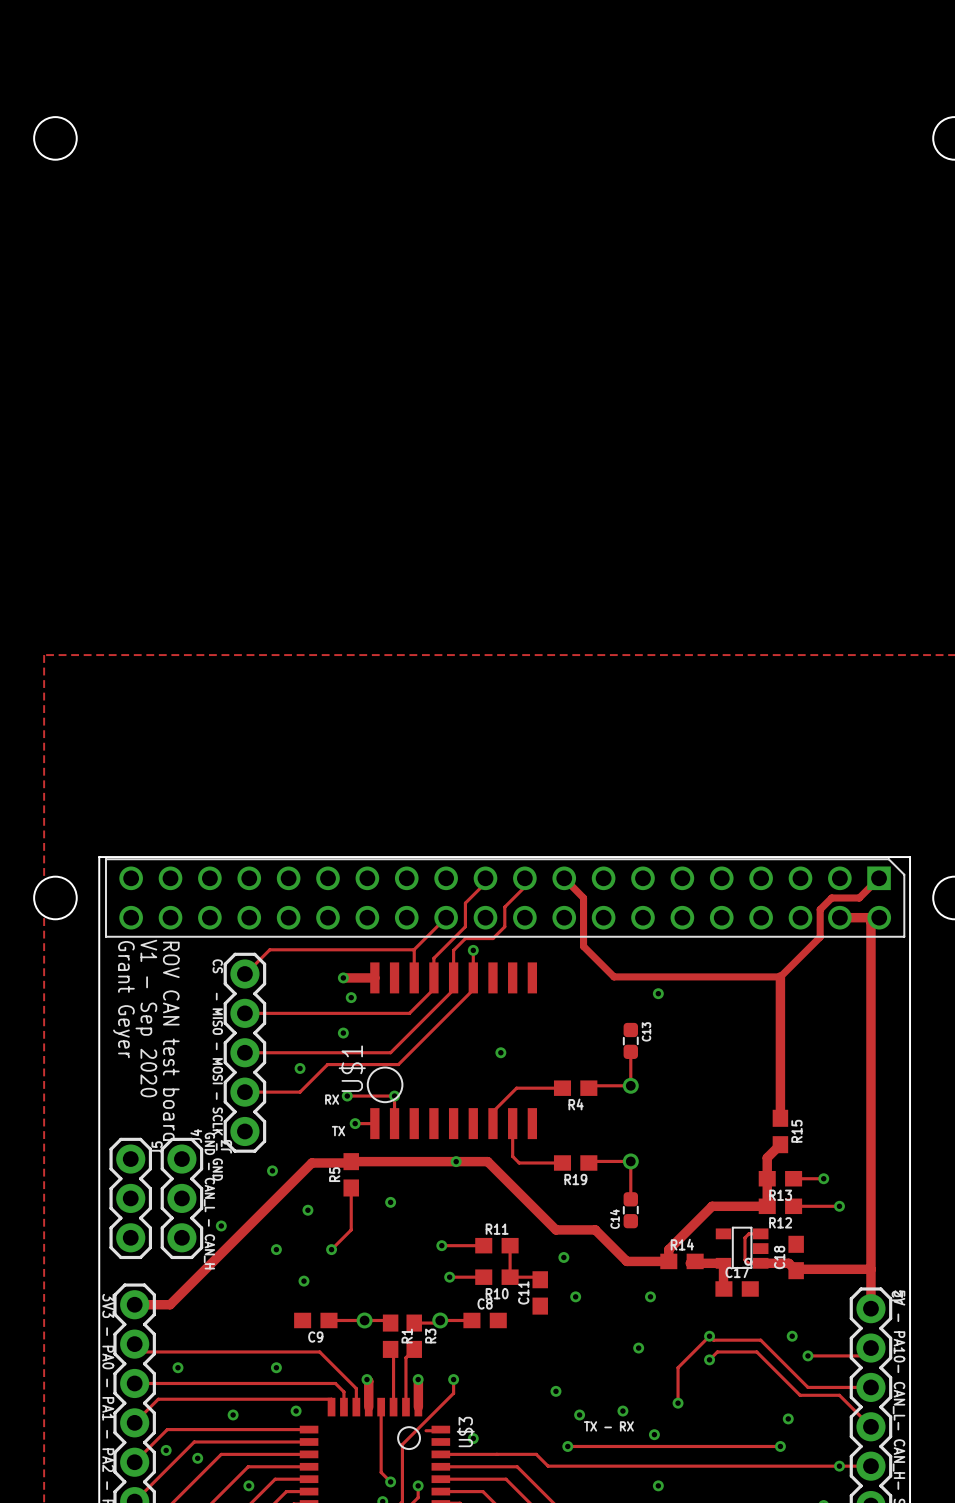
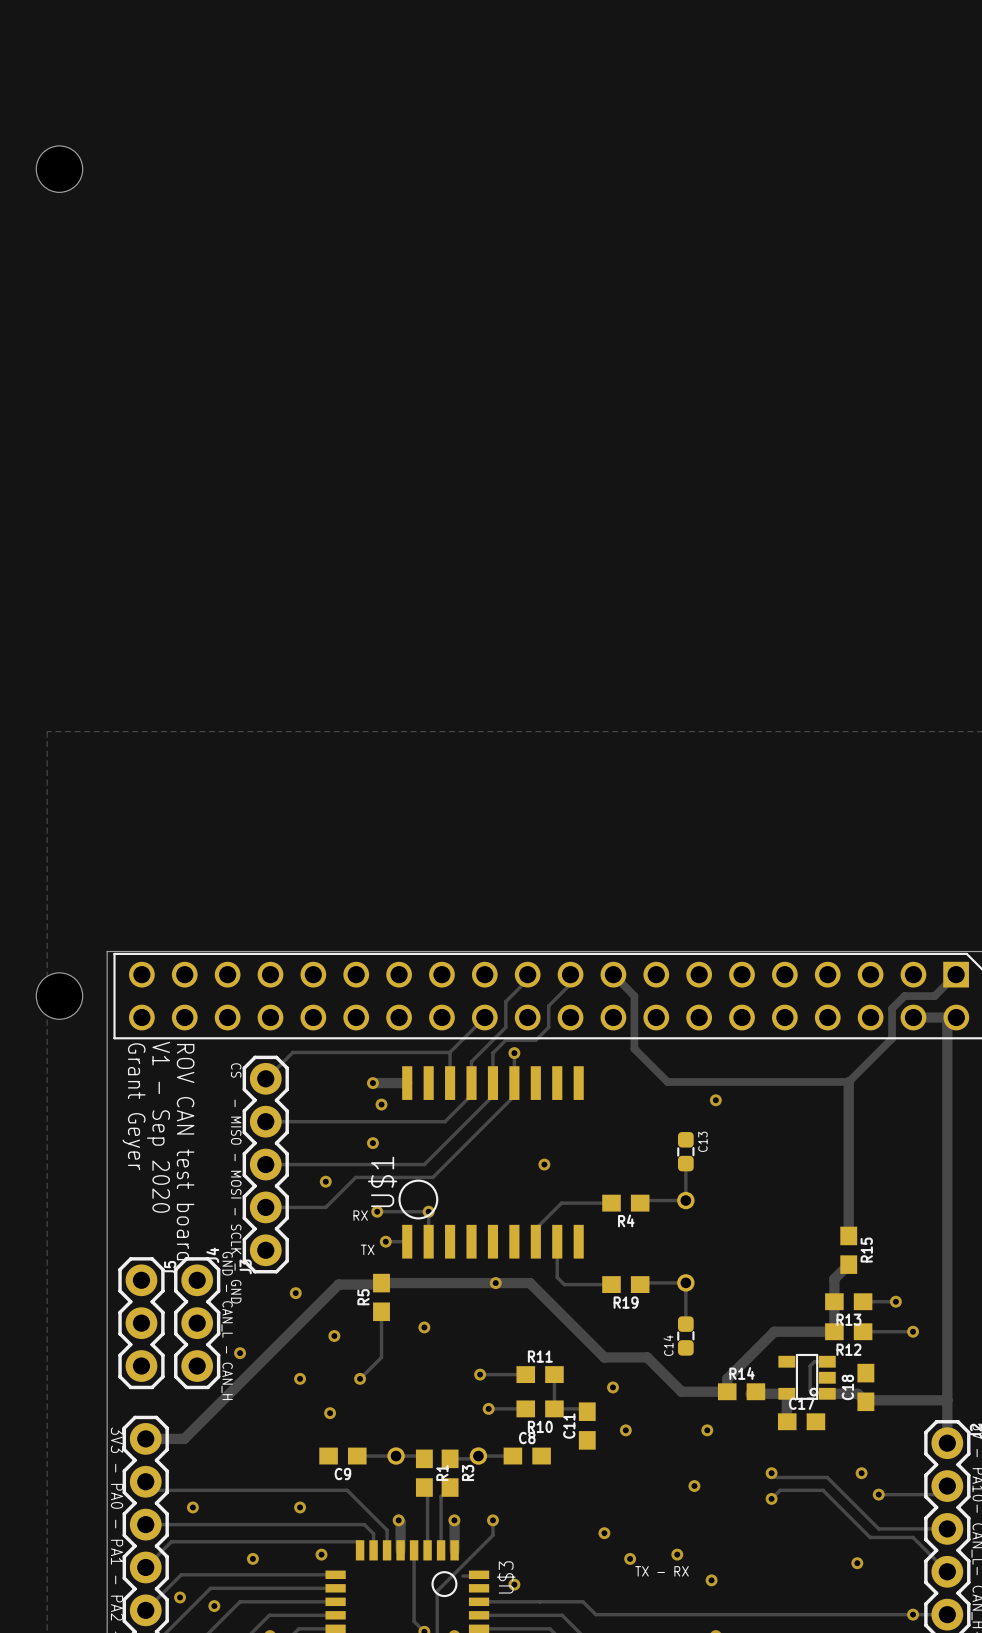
track: (709, 1336) (678, 1367) (678, 1403) -> none
via: (678, 1403) -> none
track: (567, 1446) (780, 1446) -> none
via: (567, 1446) -> none
via: (780, 1446) -> none

